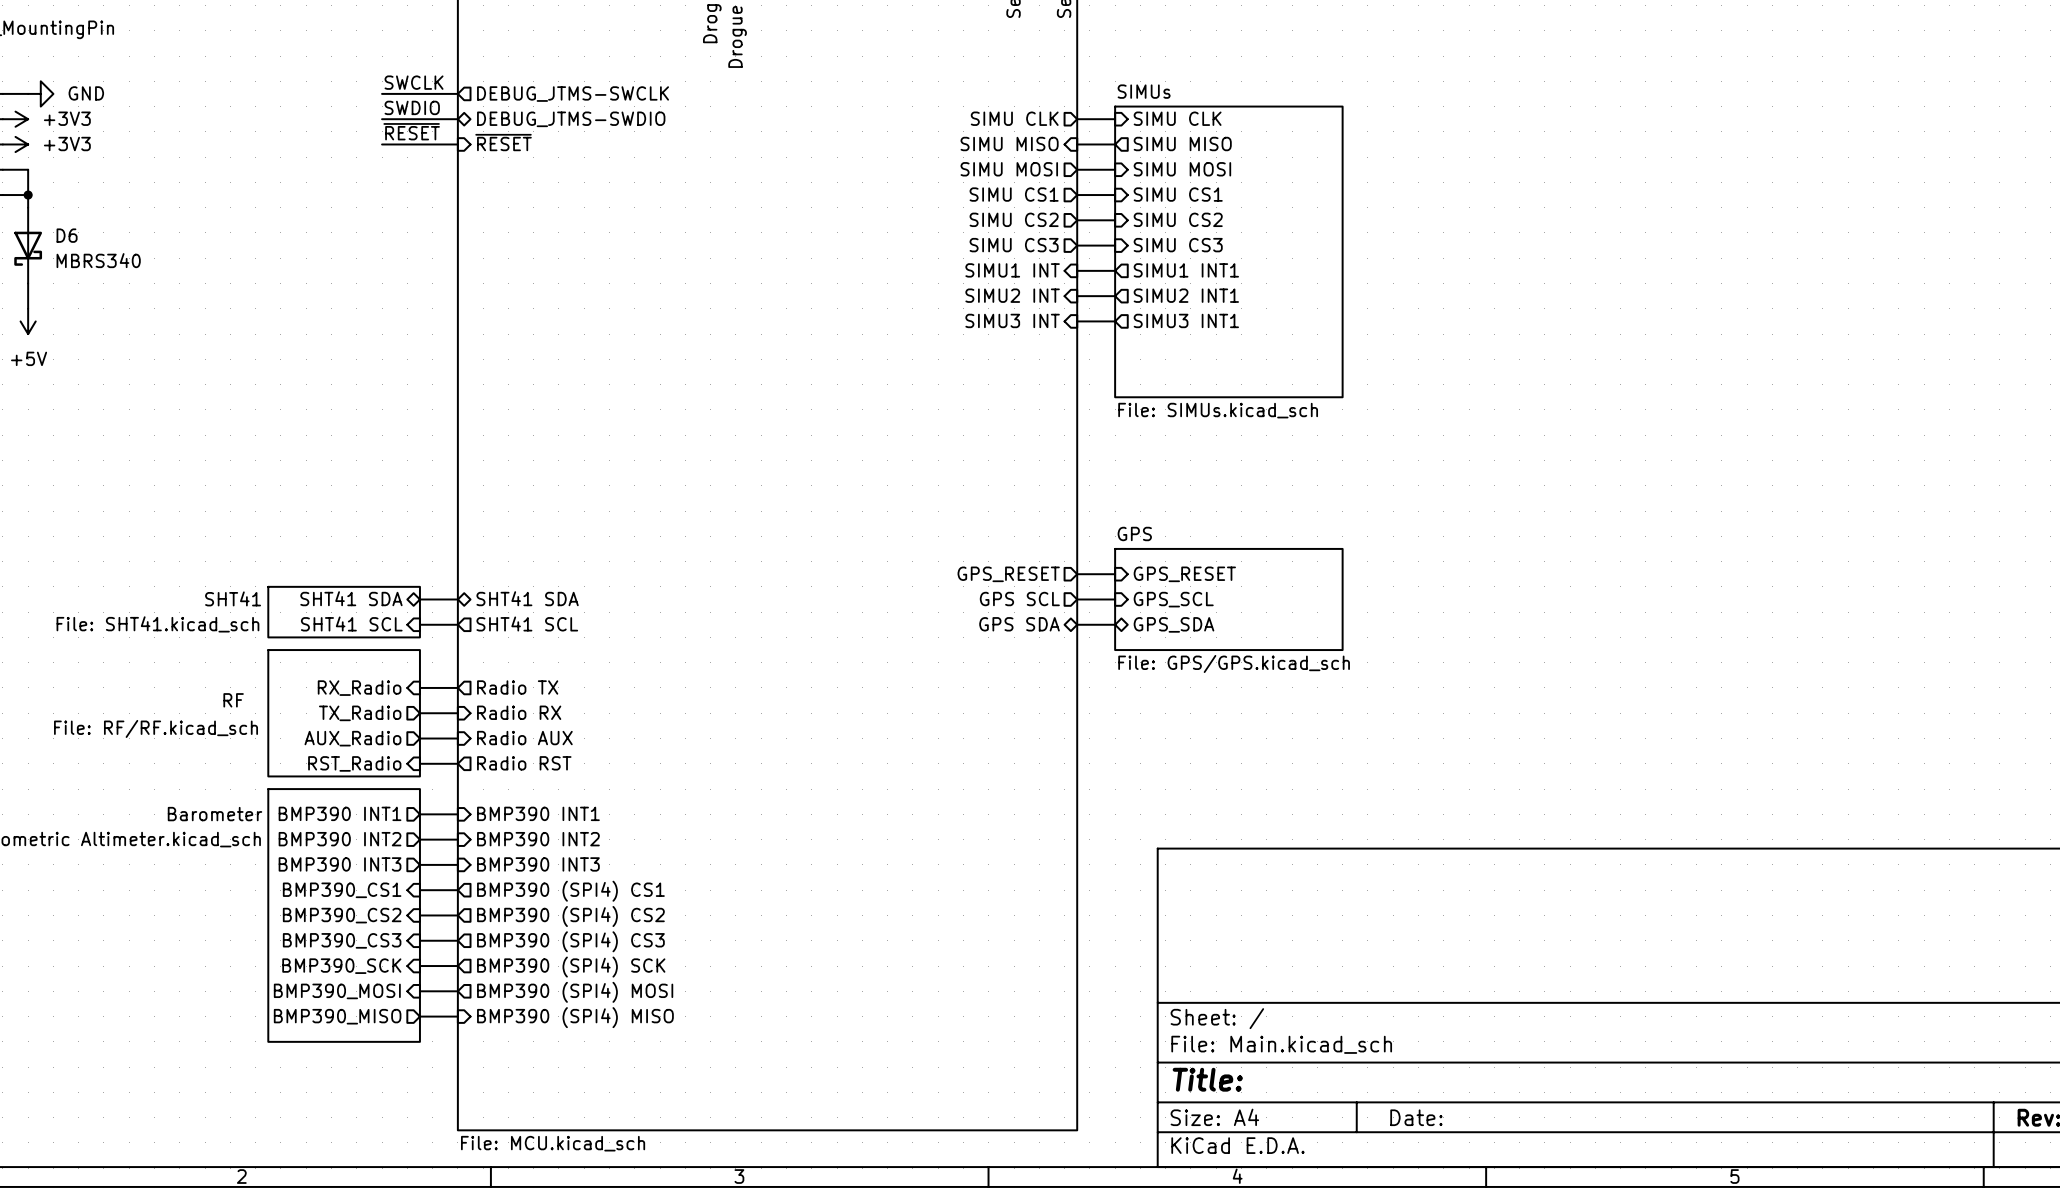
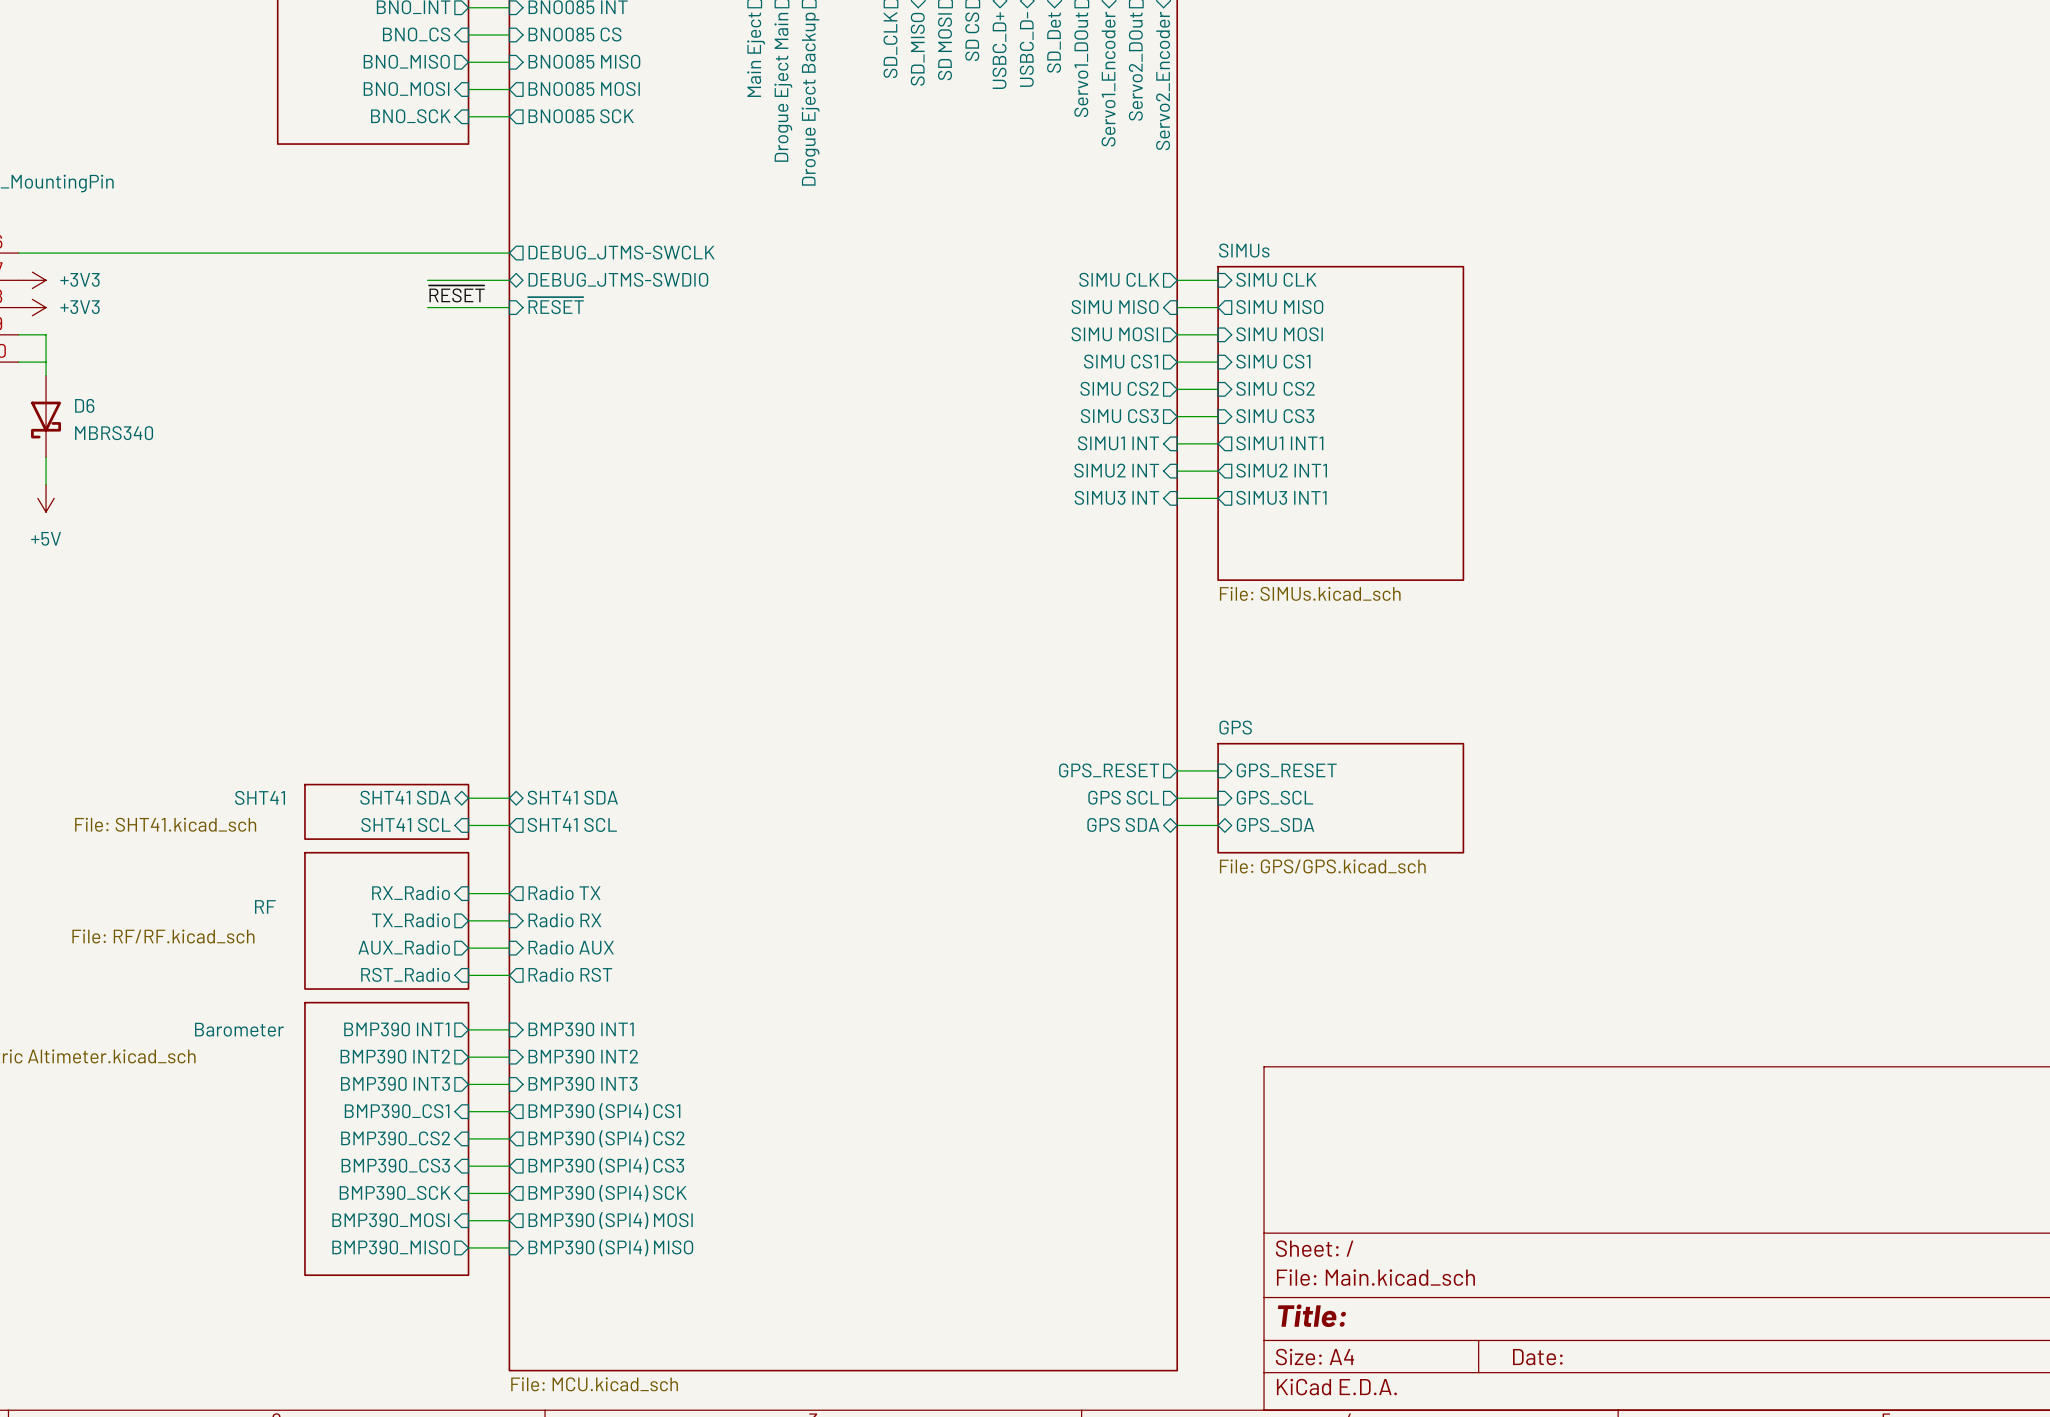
label: SWCLK (414, 82) -> none
wire: none -> (46, 253) (427, 253)
power symbol: GND (40, 93) -> none
label: SWDIO (412, 107) -> none
junction: (28, 195) -> none

